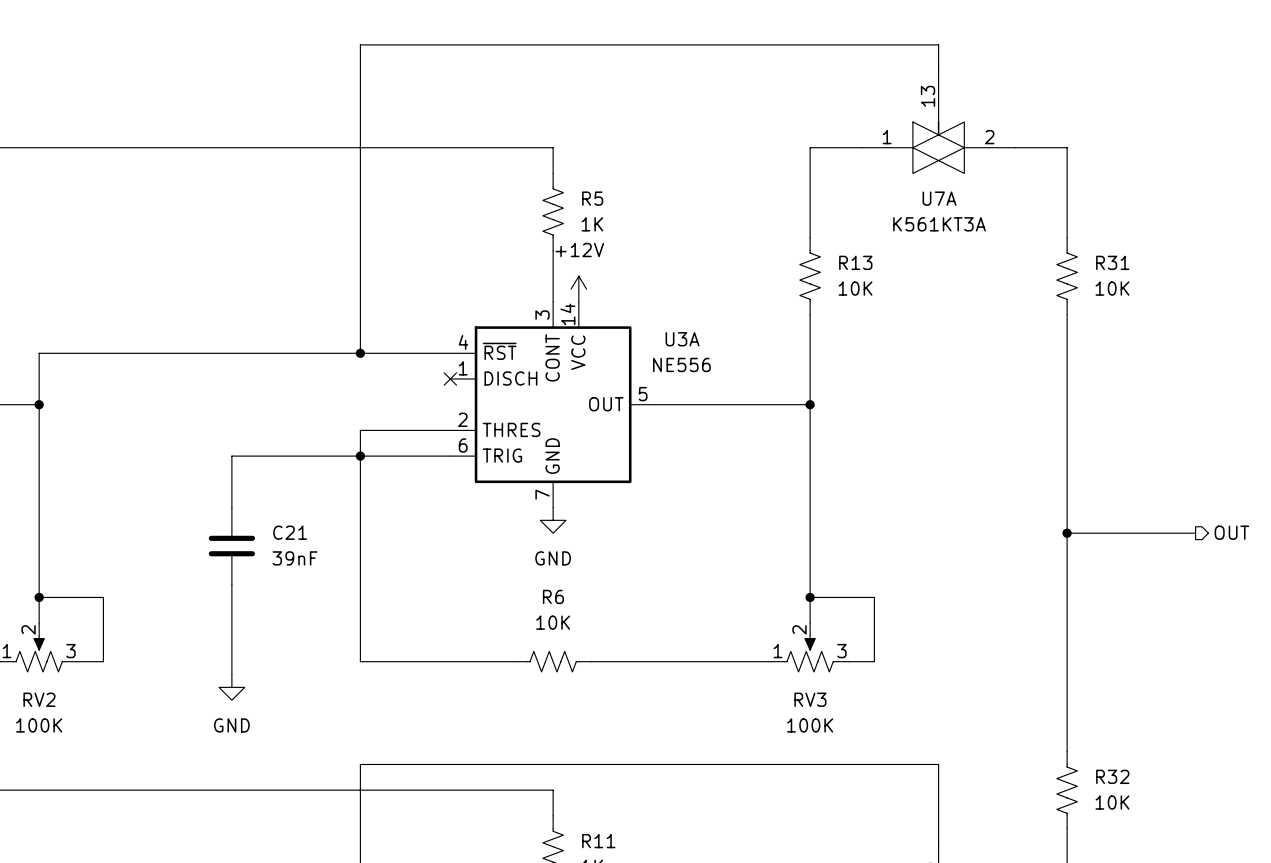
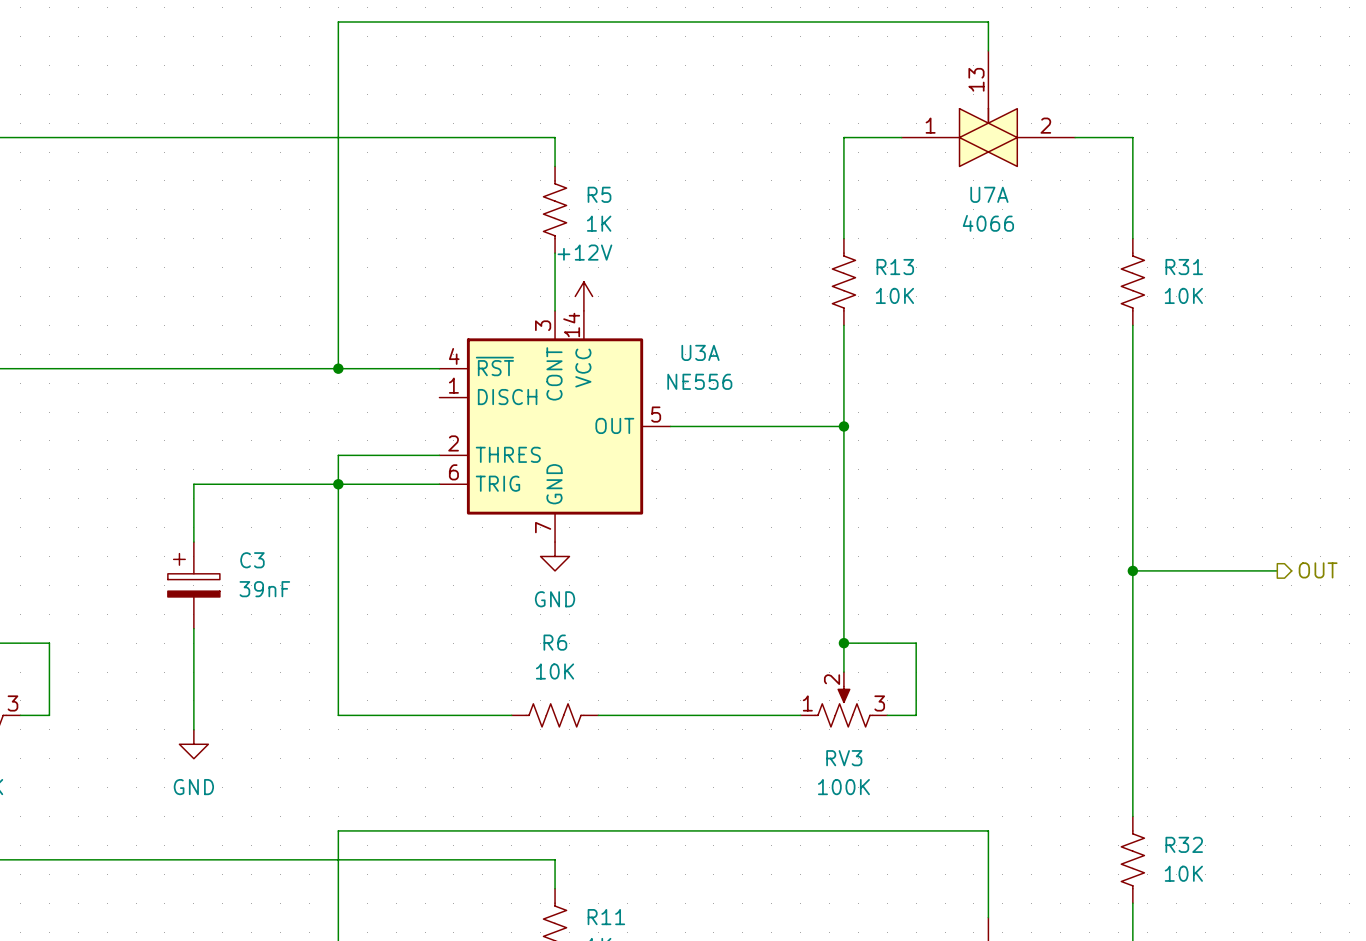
U7A value: К561КТ3А (939, 224) -> 4066 (988, 223)
no-connect mark: (450, 379) -> none
C21: 39nF (231, 546) -> none
C3: none -> 39nF (193, 585)

